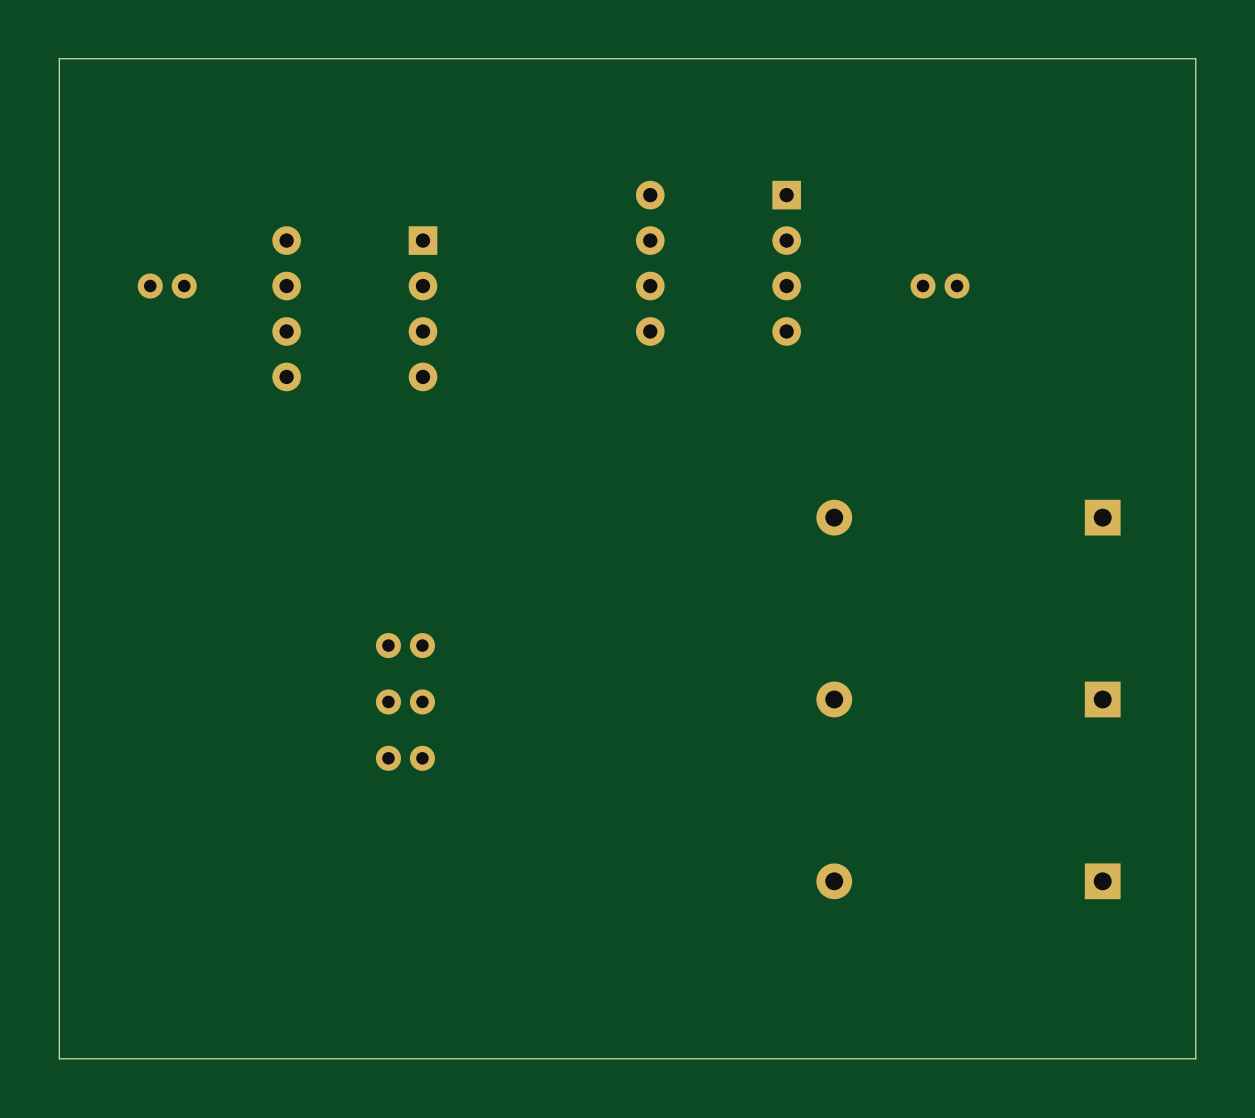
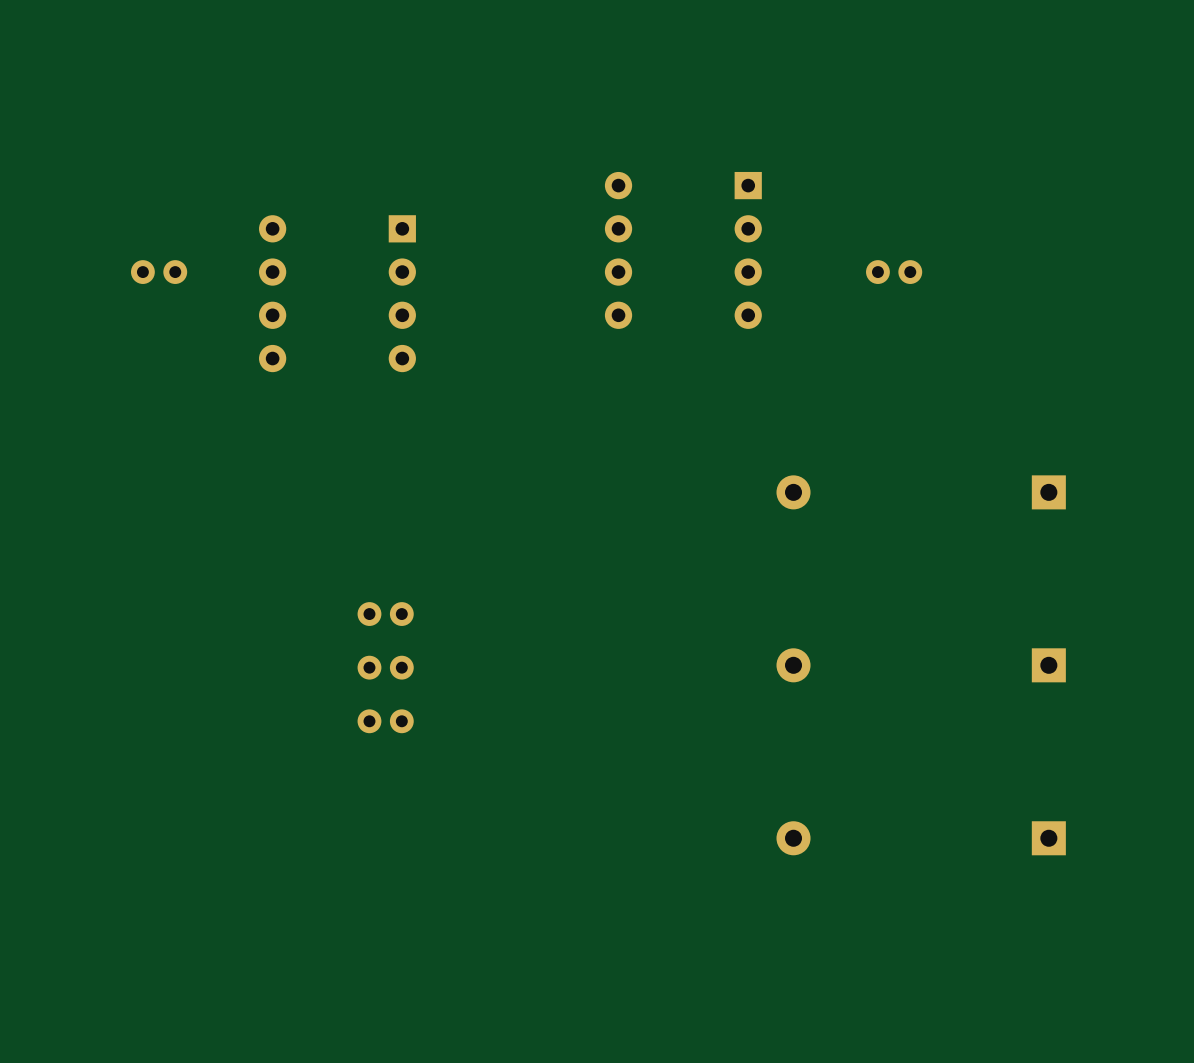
board edge: (1195, 58) (59, 58) (59, 1058) (1195, 1058) (1195, 58) -> none

